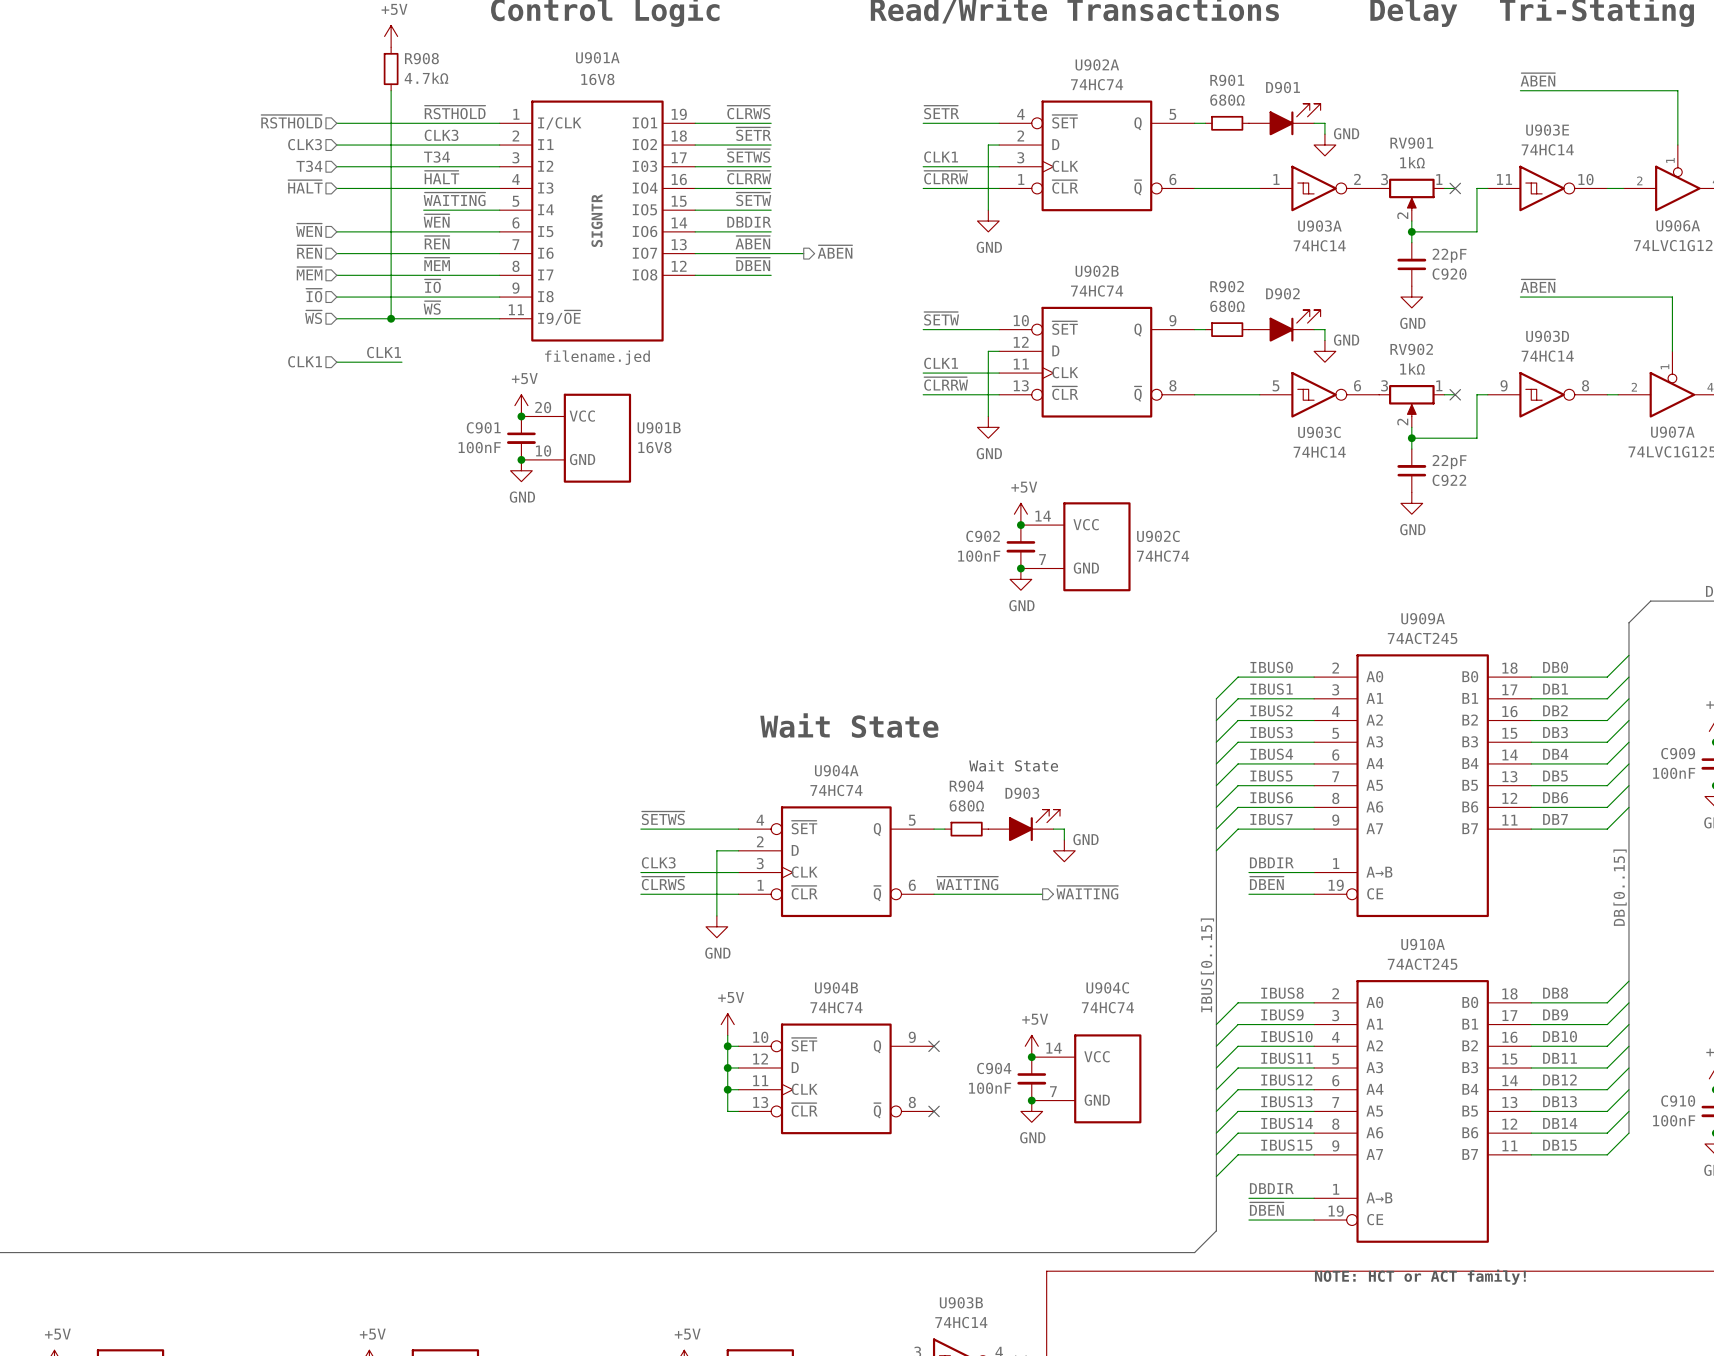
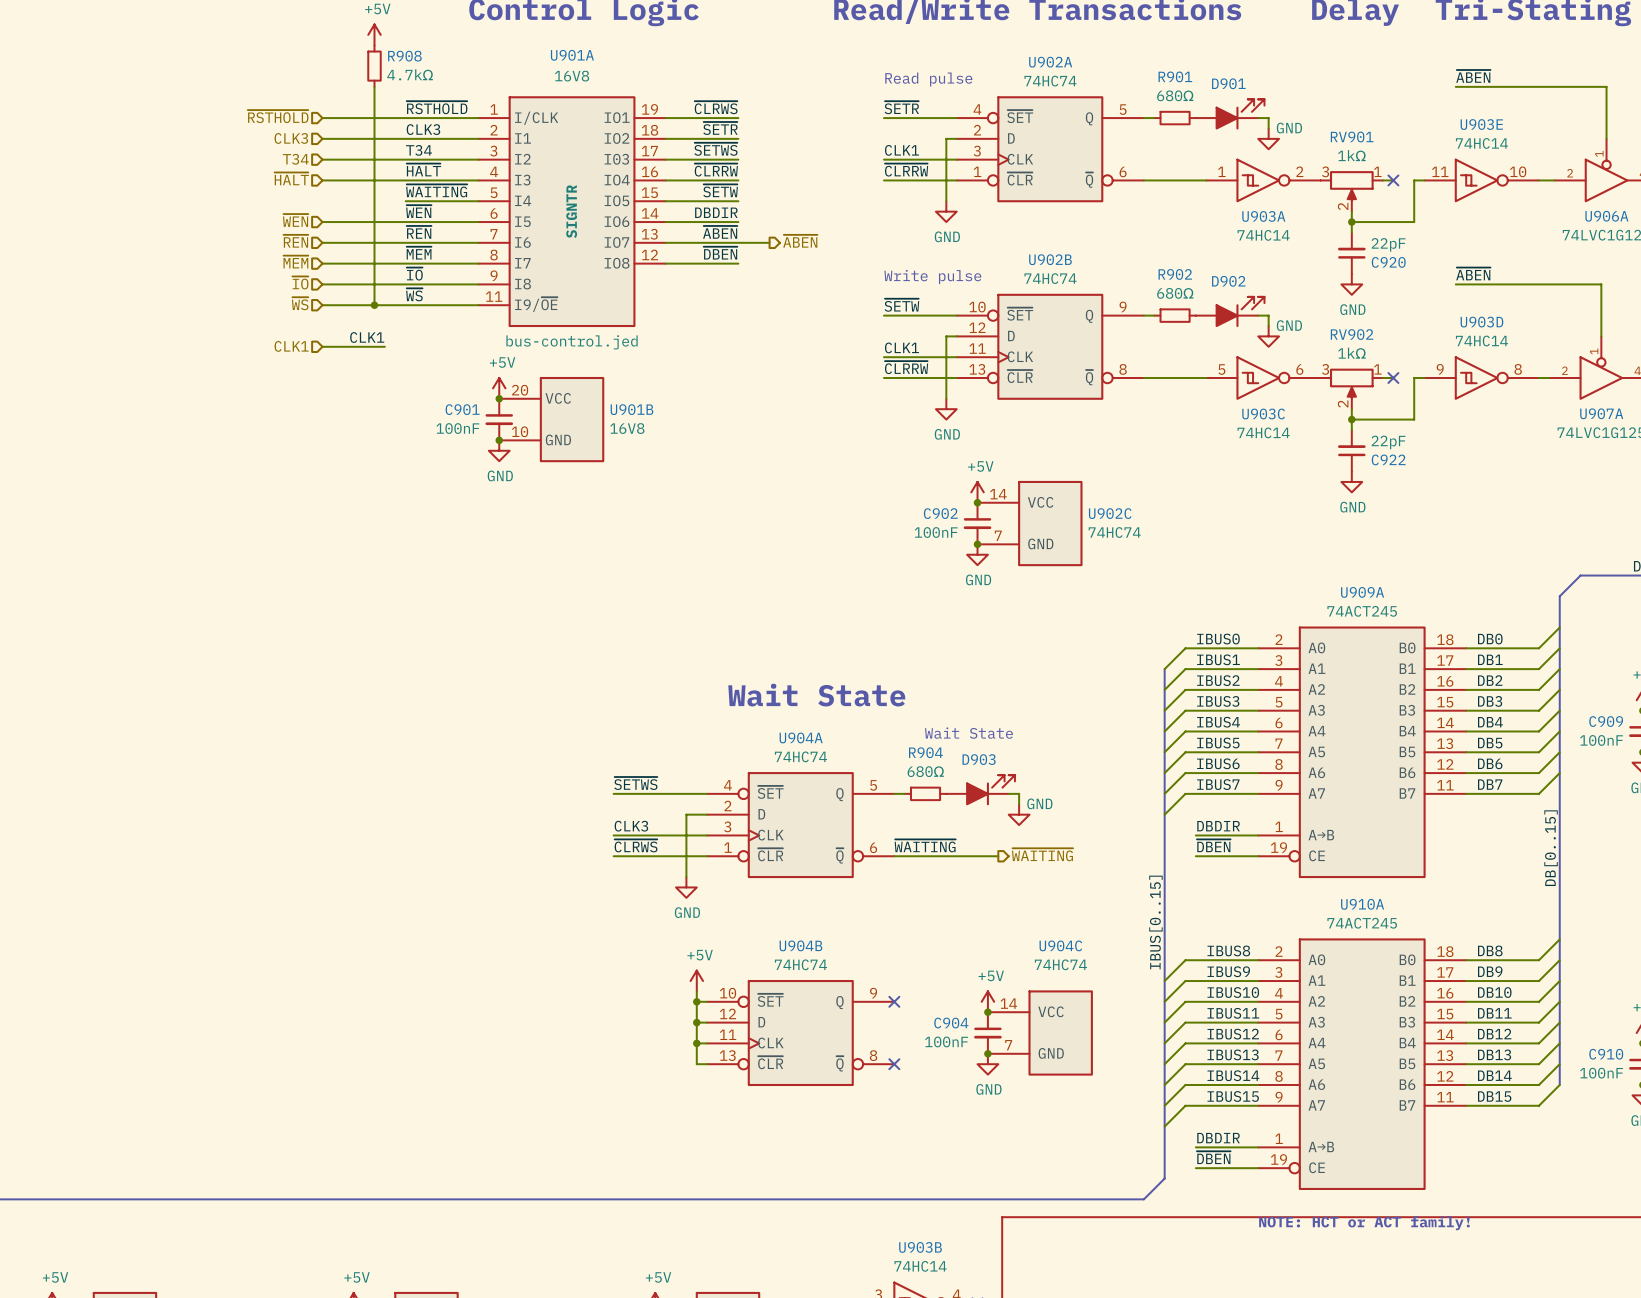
text: none -> Read pulse (928, 79)
text: none -> Write pulse (932, 277)
U901A text: filename.jed (597, 357) -> bus-control.jed (572, 342)

